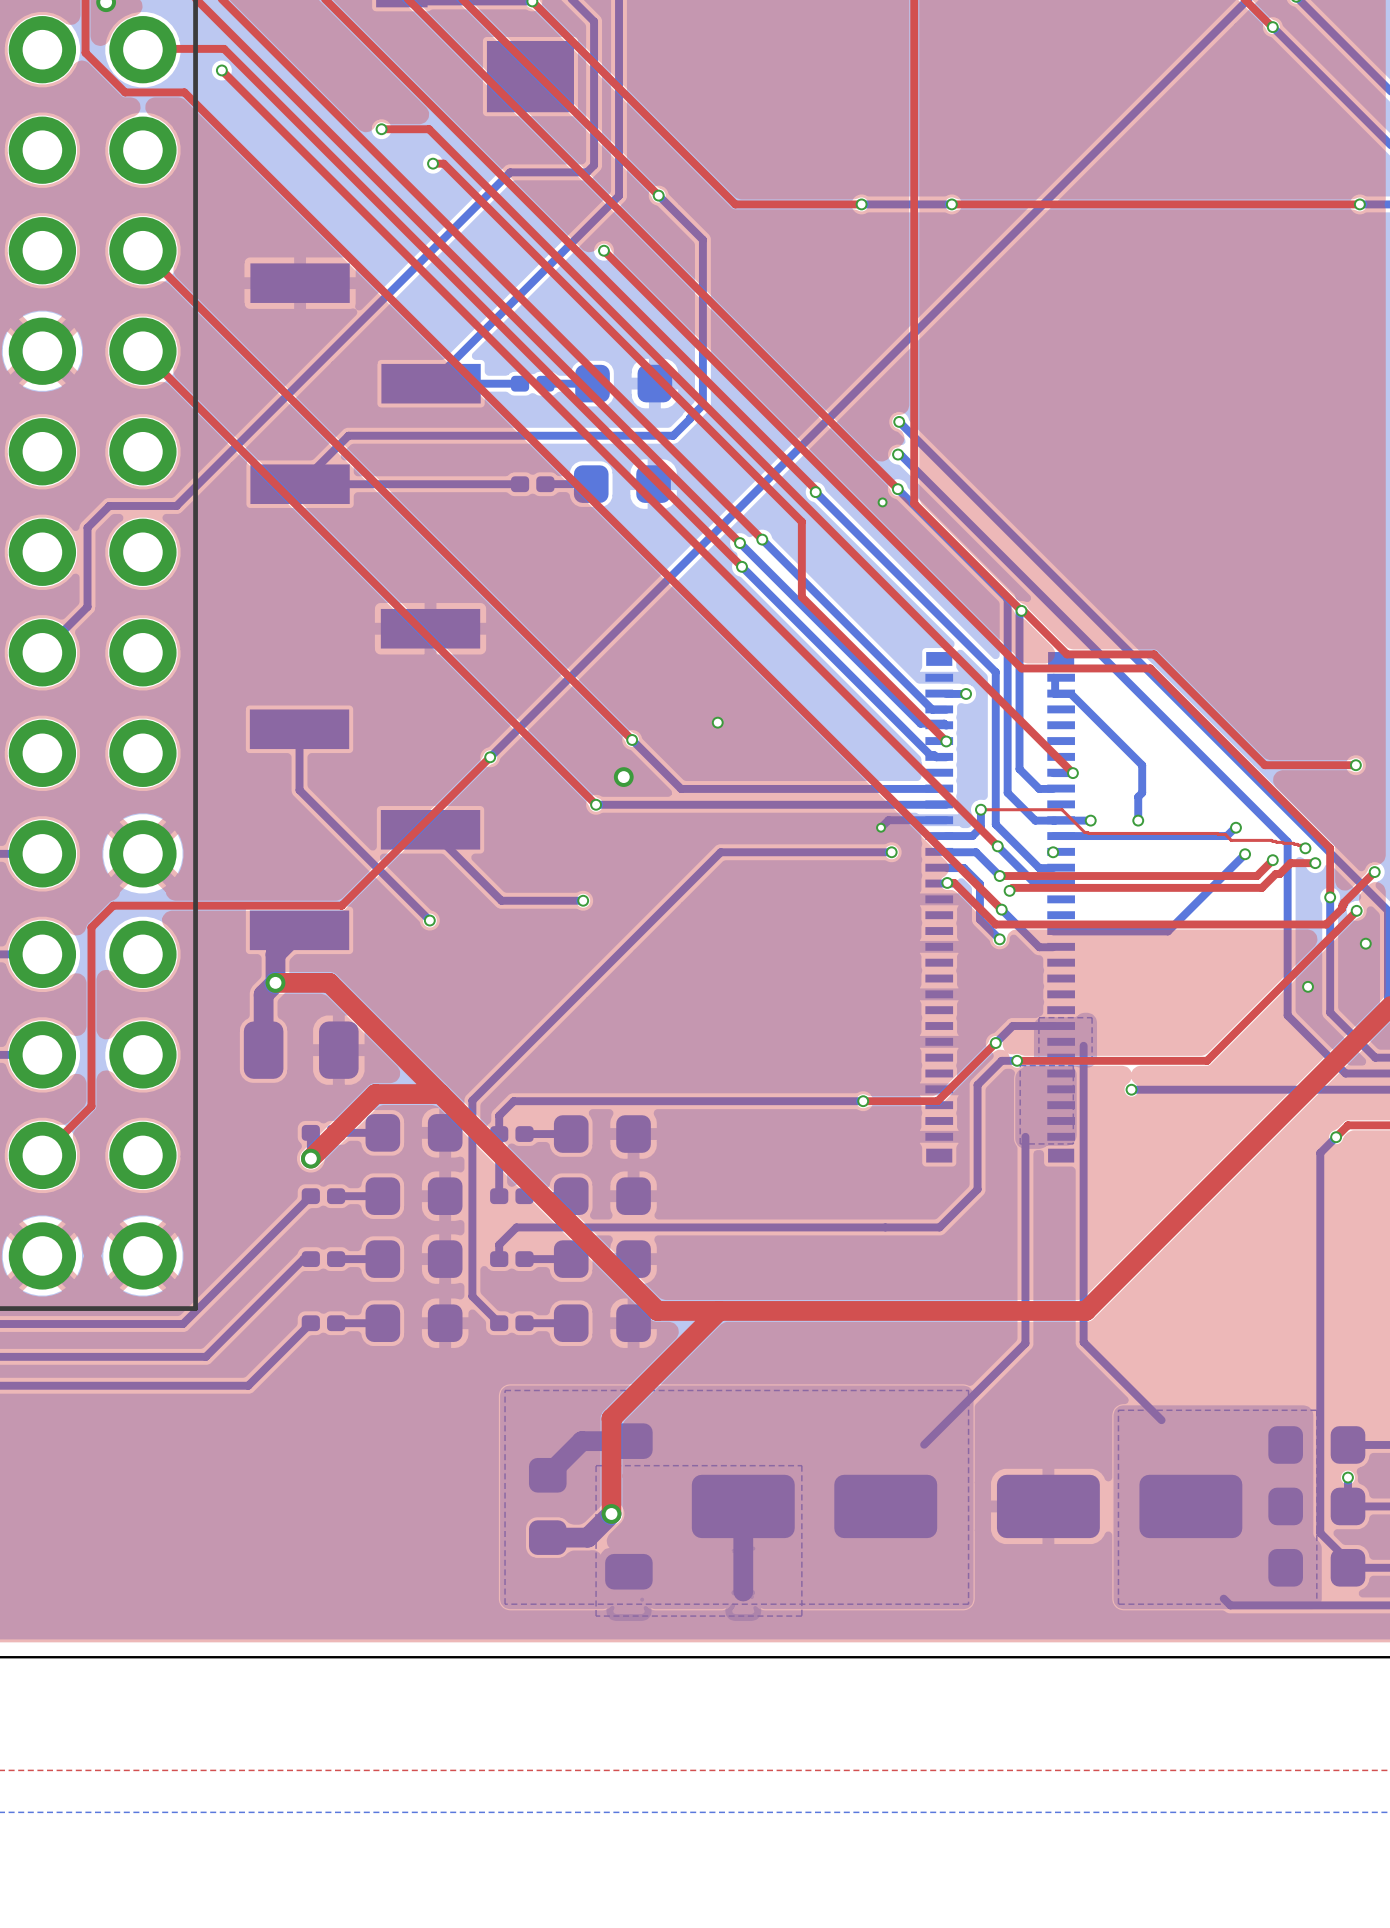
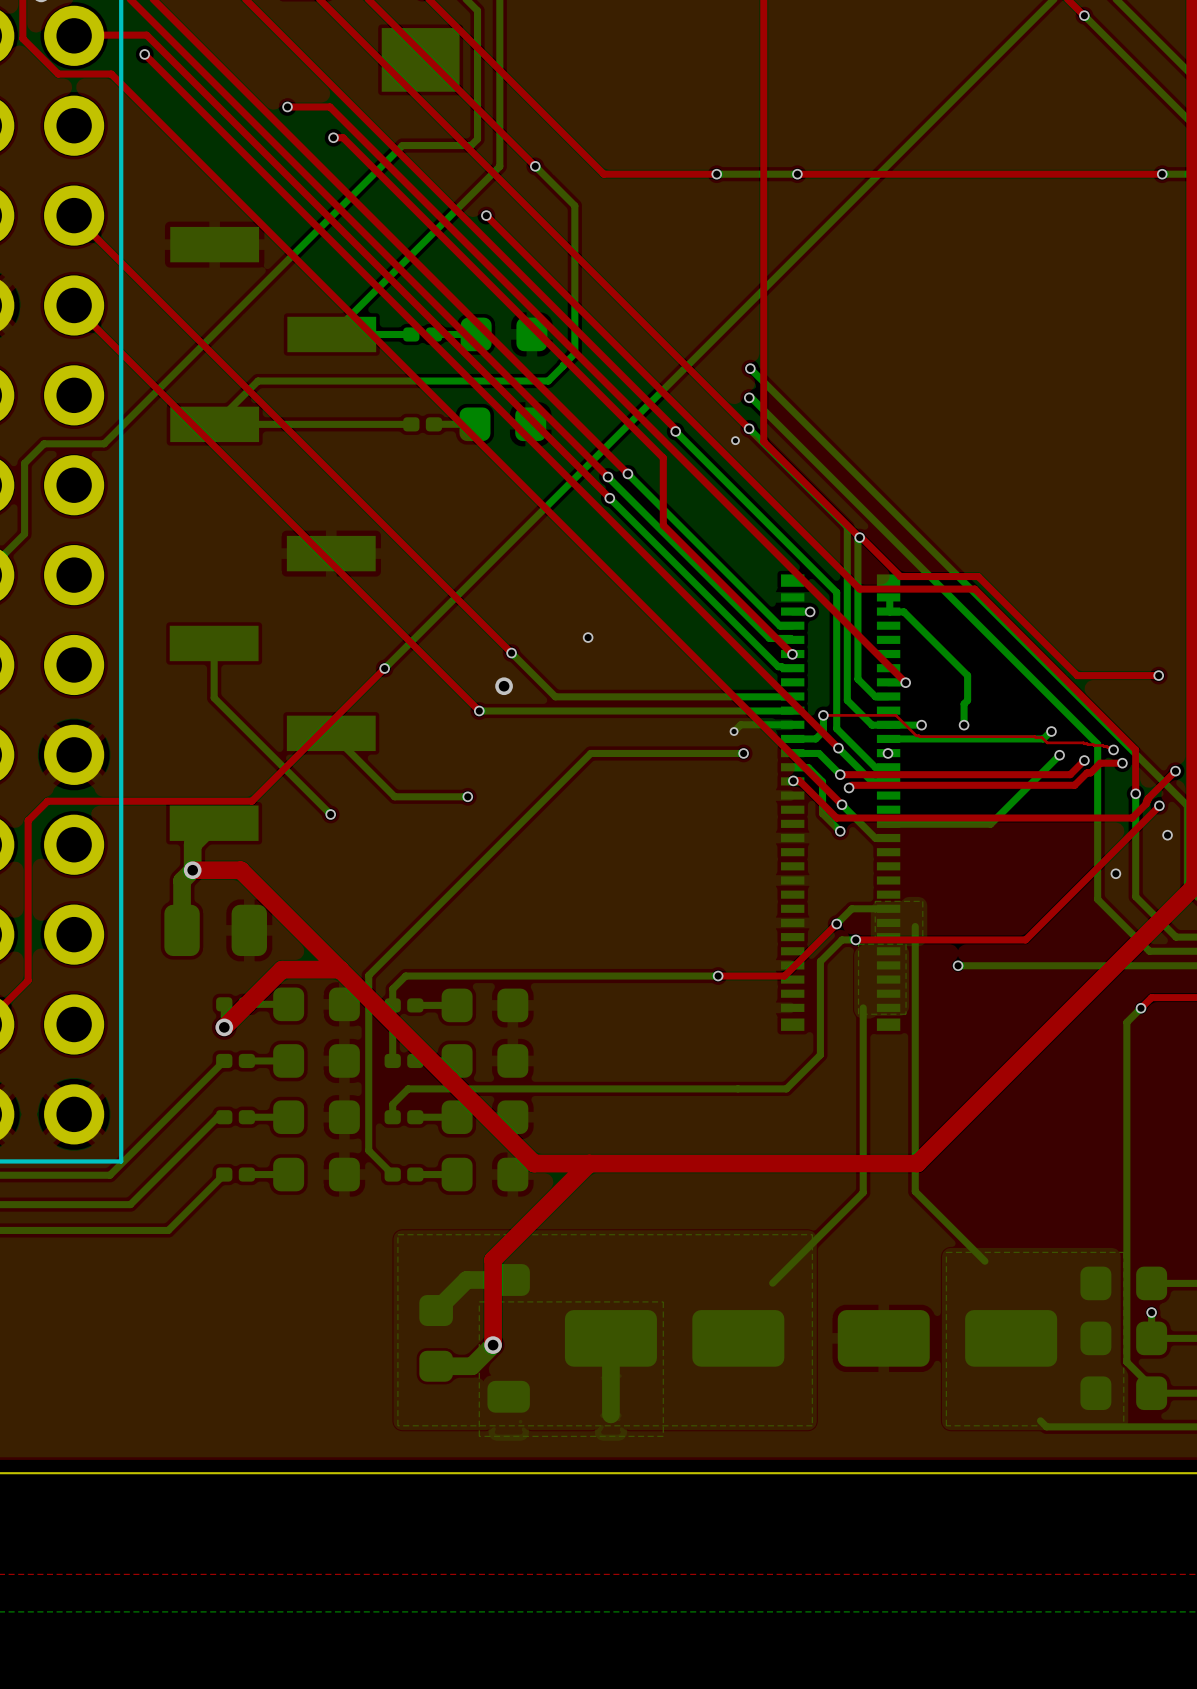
part footprint: [925, 652, 1075, 1163] -> [781, 574, 901, 1031]

